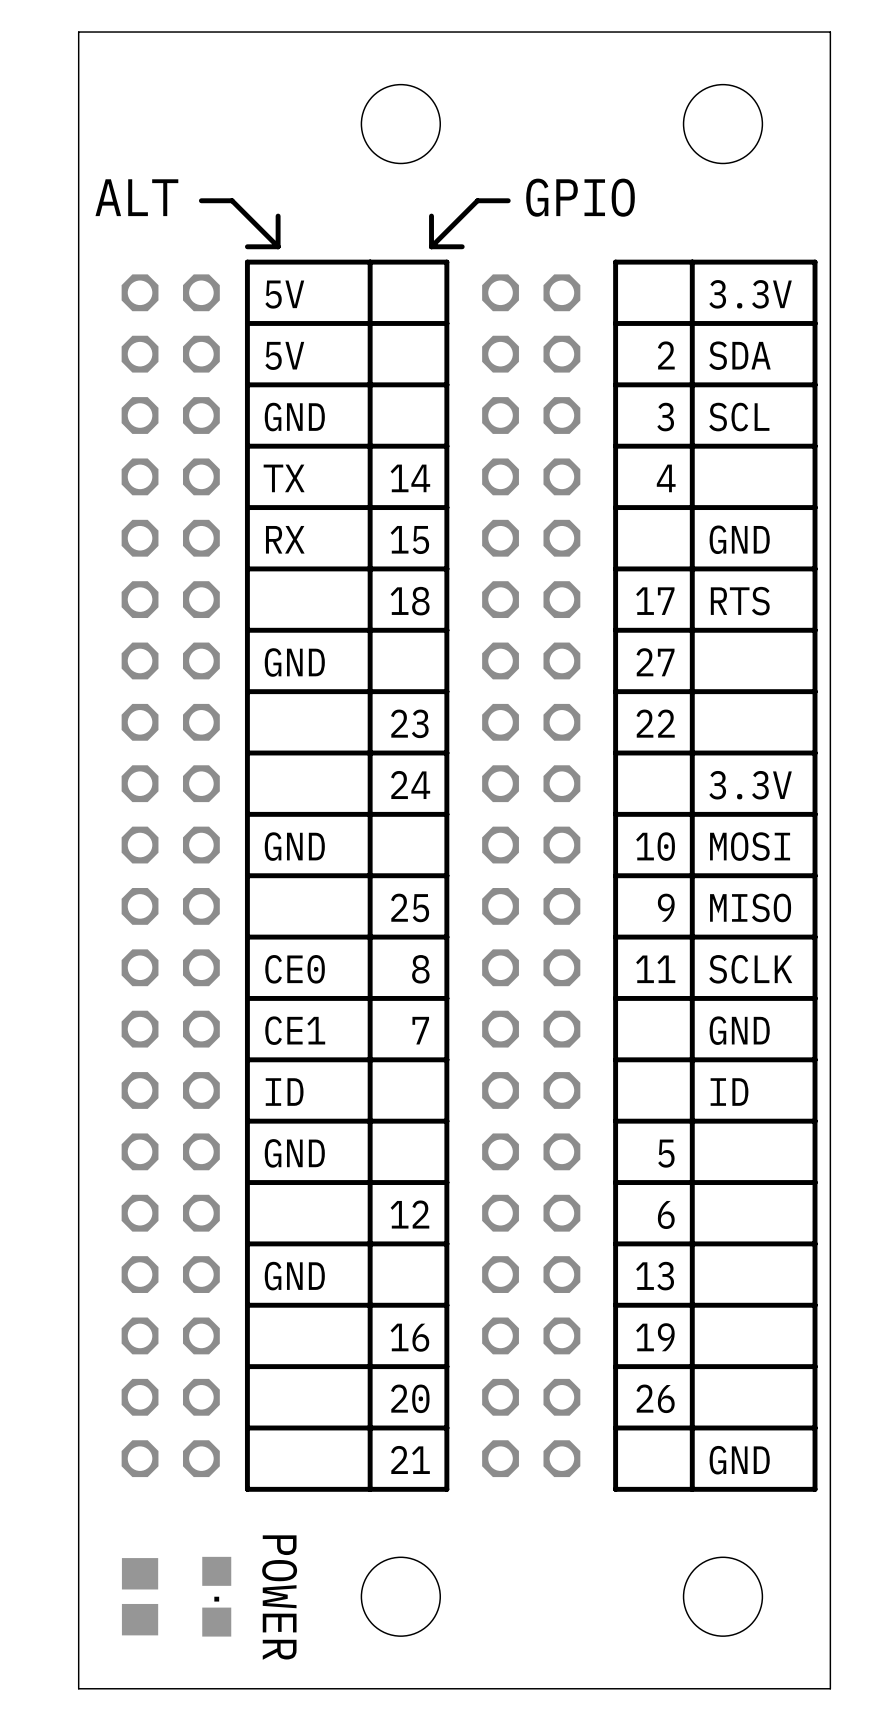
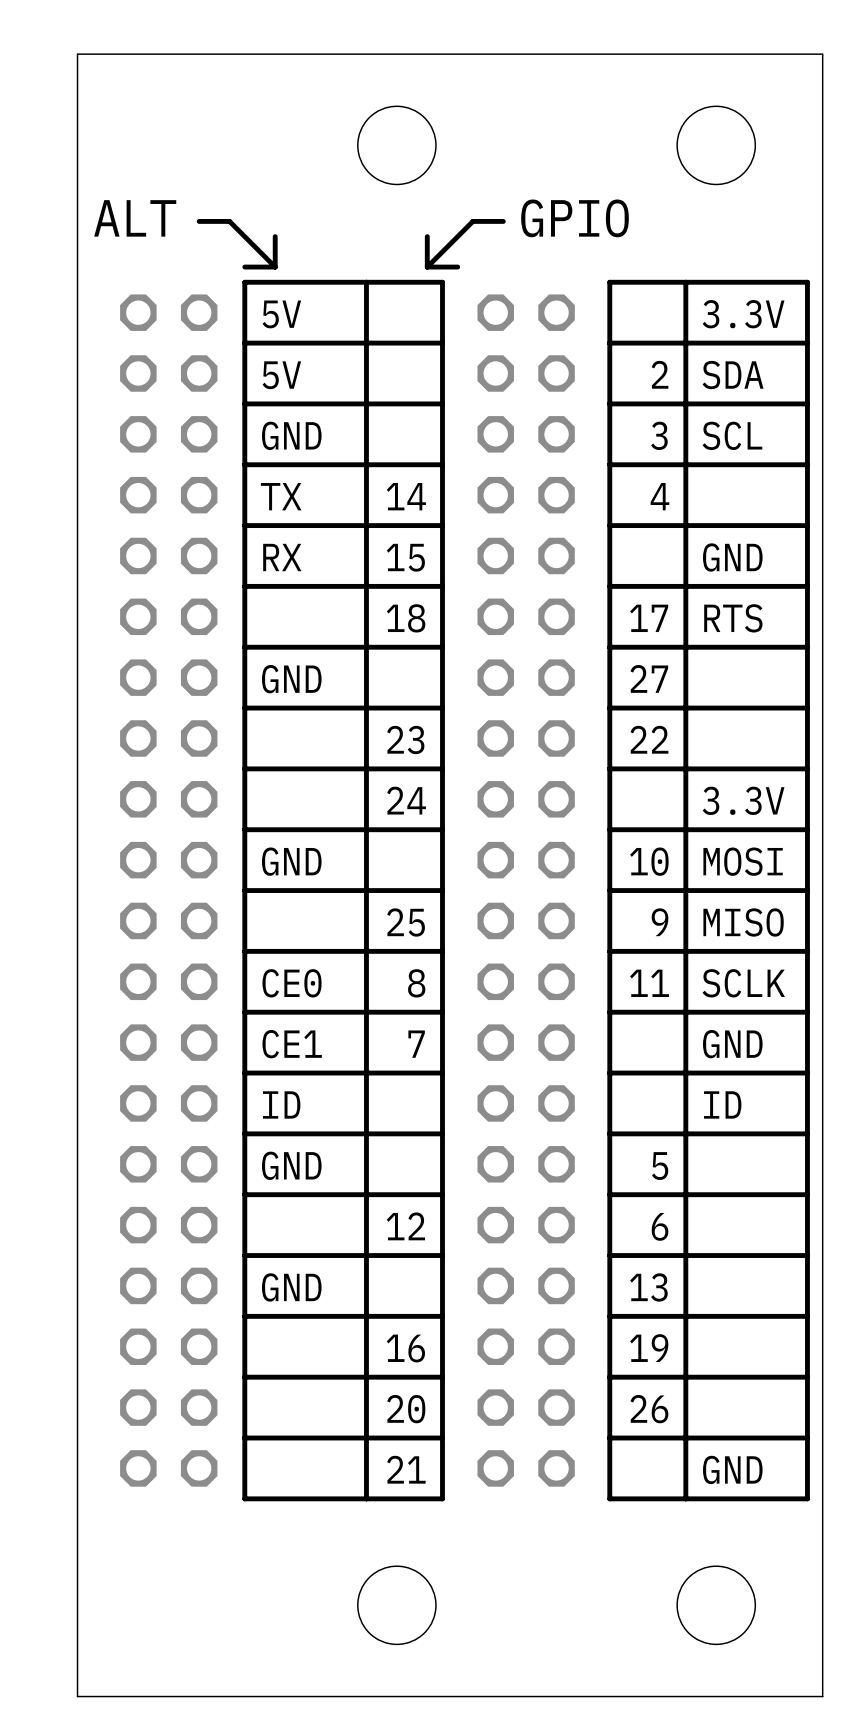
part: (140, 1596) -> none
part: (216, 1596) -> none
text: POWER (279, 1597) -> none

